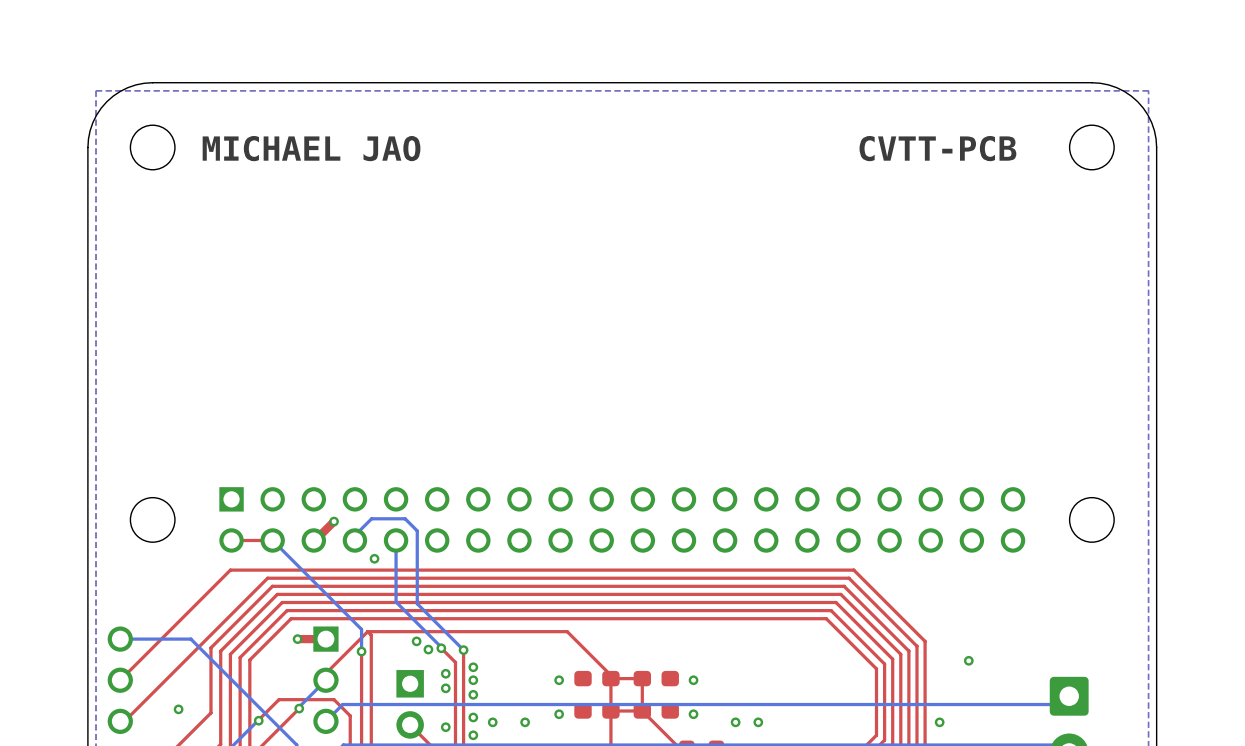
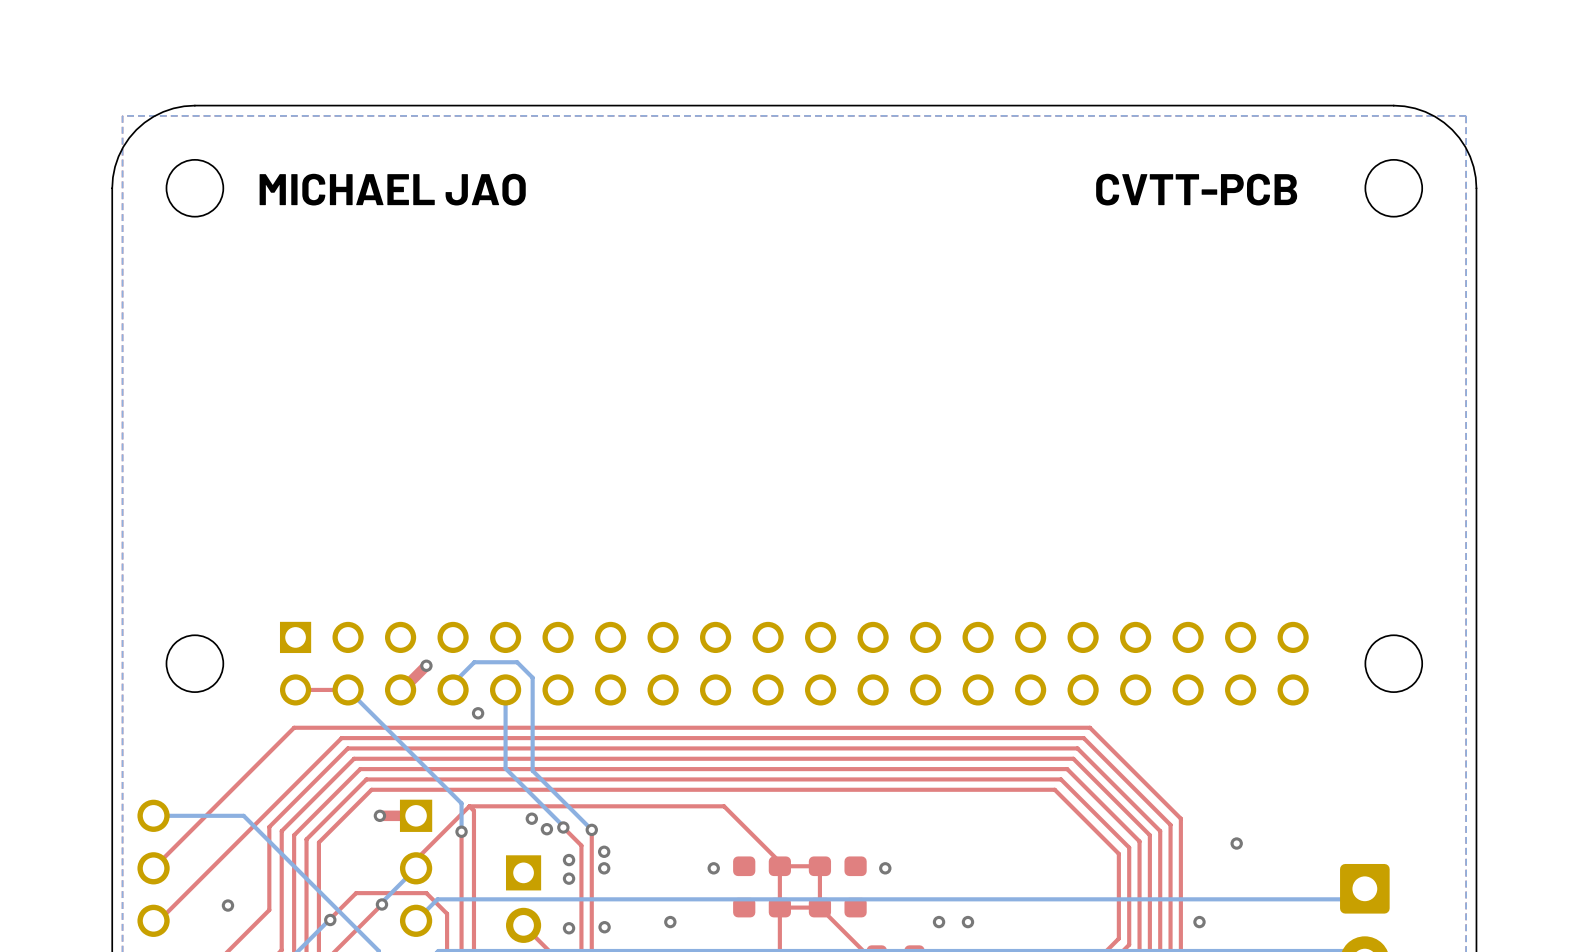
via: (473, 694) -> none
via: (559, 714) -> none
via: (693, 714) -> none
via: (473, 717) -> none
via: (492, 722) -> none
via: none -> (604, 927)
via: (473, 735) -> none

